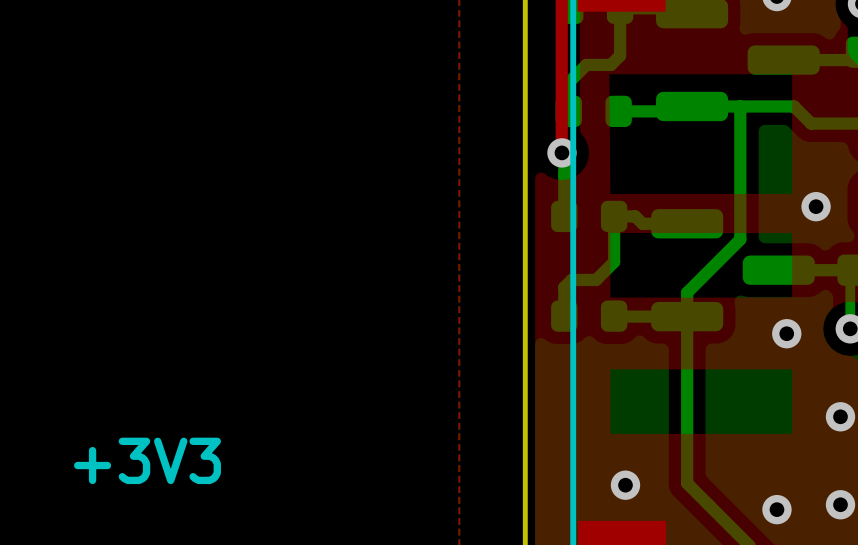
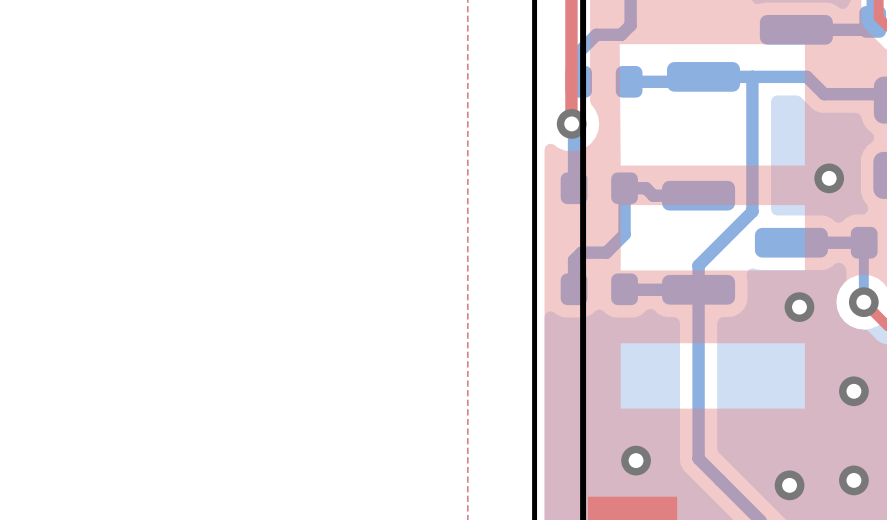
text: +3V3 (147, 460) -> none

